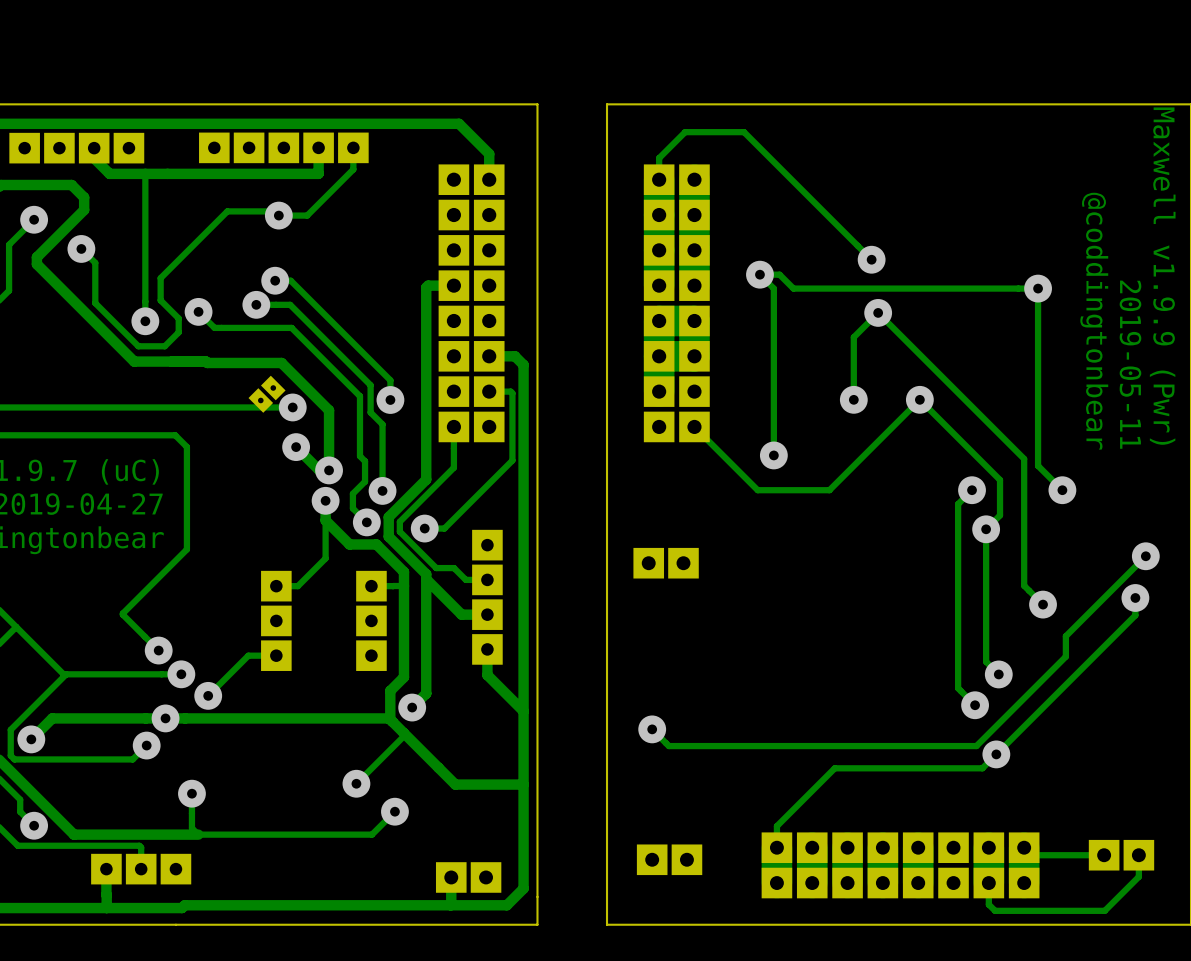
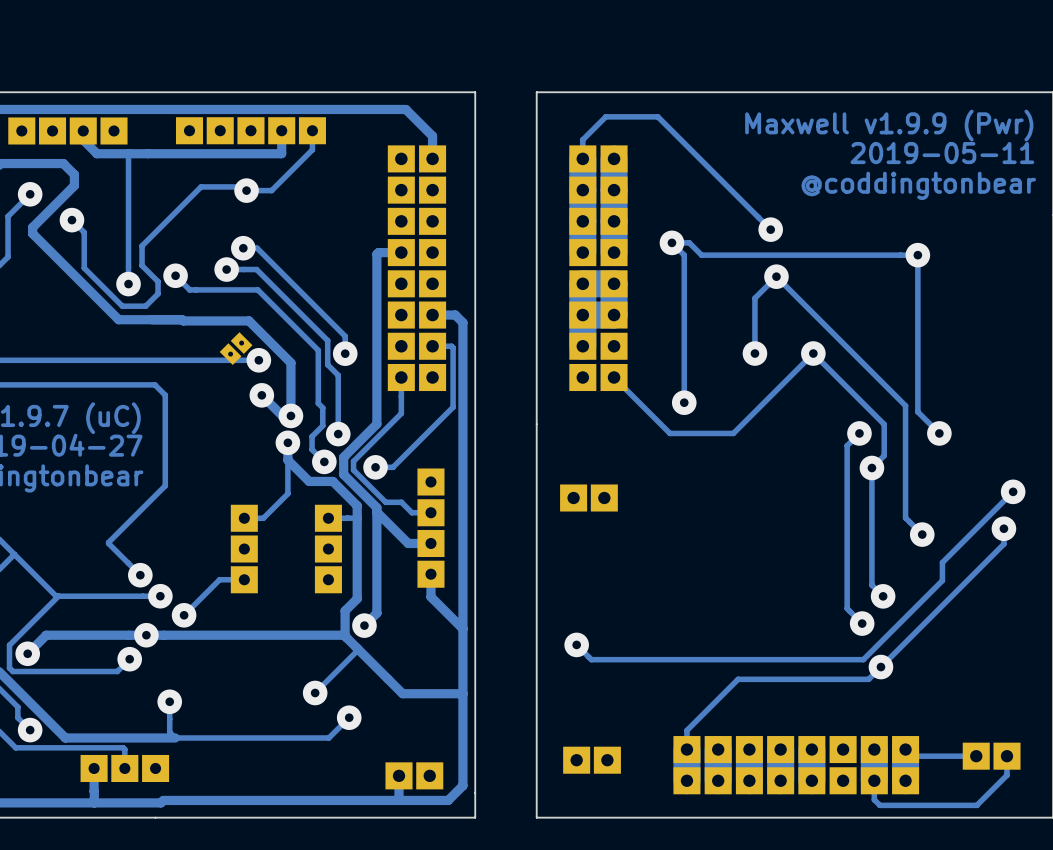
text rotation: 0° (1162, 276) -> 90° counterclockwise (889, 125)
text rotation: 0° (1094, 321) -> 90° counterclockwise (918, 185)
text rotation: 0° (1130, 364) -> 90° counterclockwise (942, 153)

